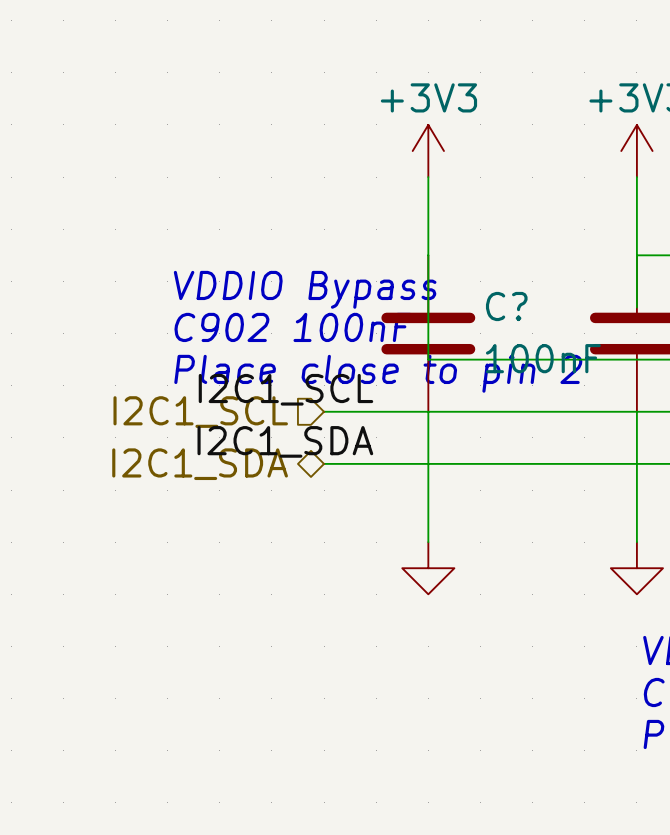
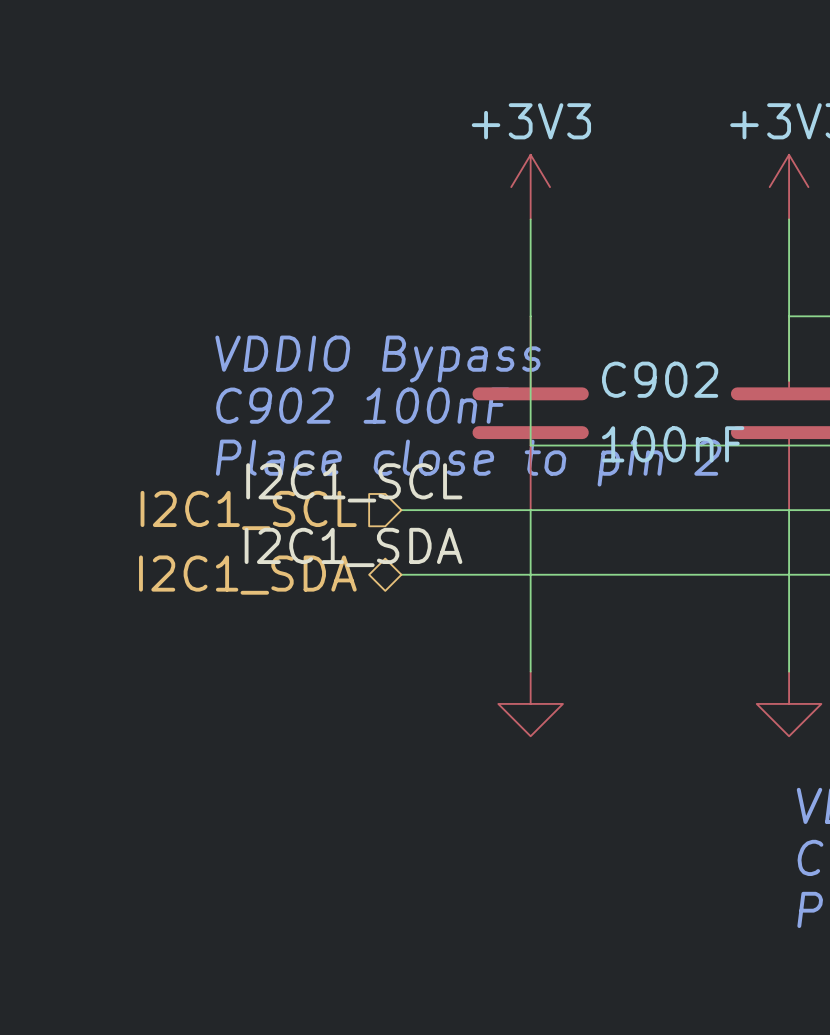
C? name: C? (506, 306) -> C902 (660, 379)

